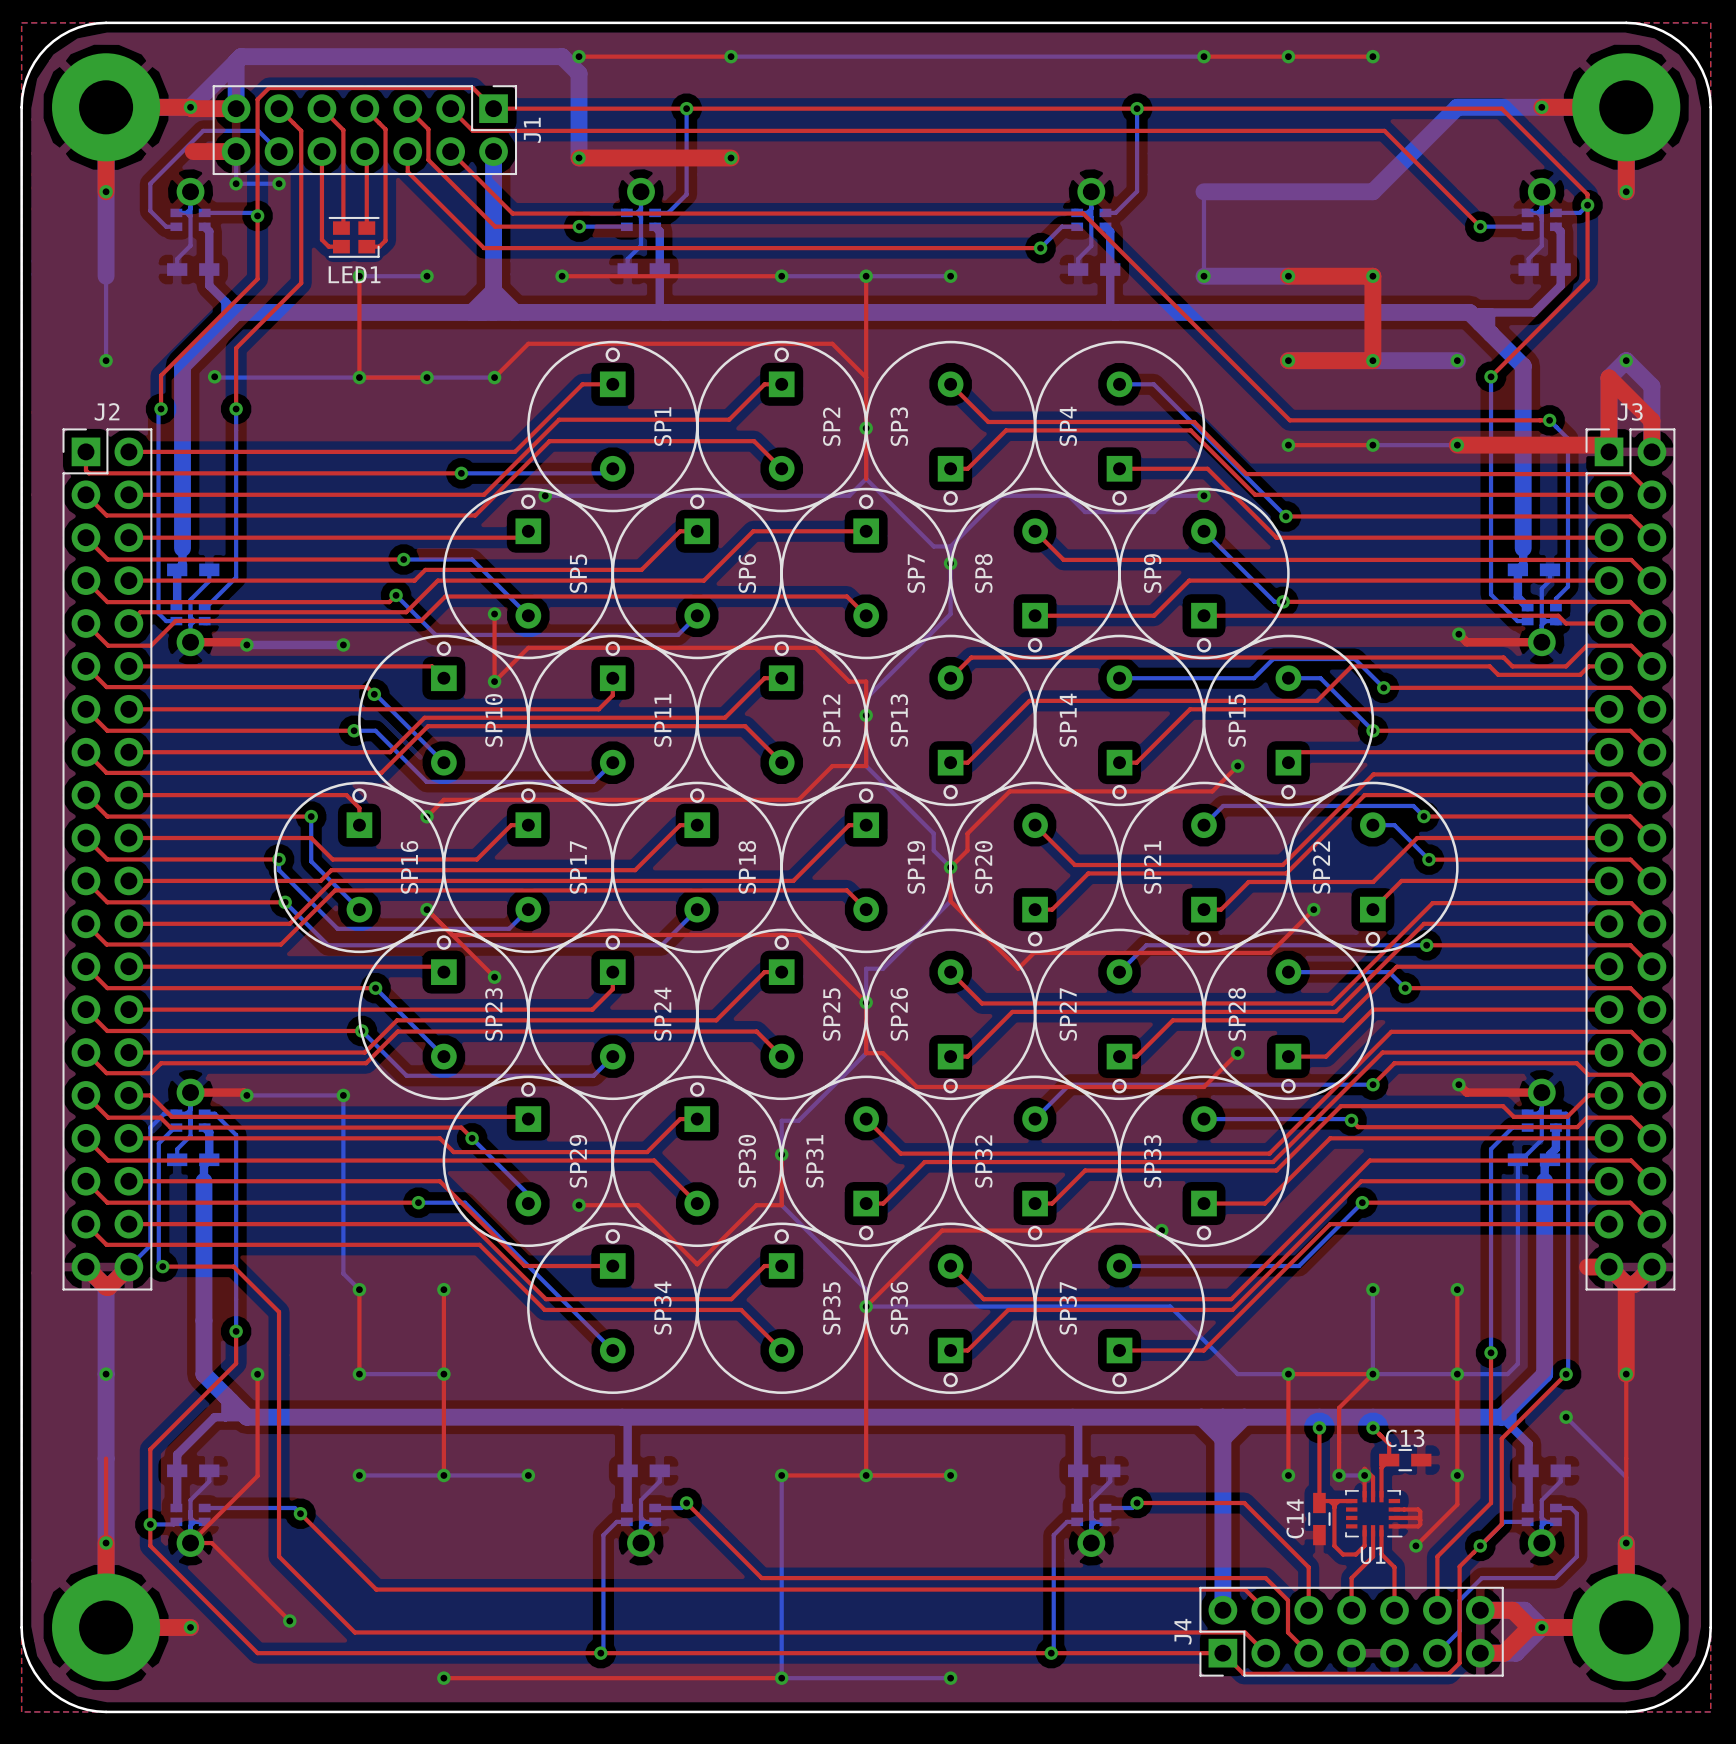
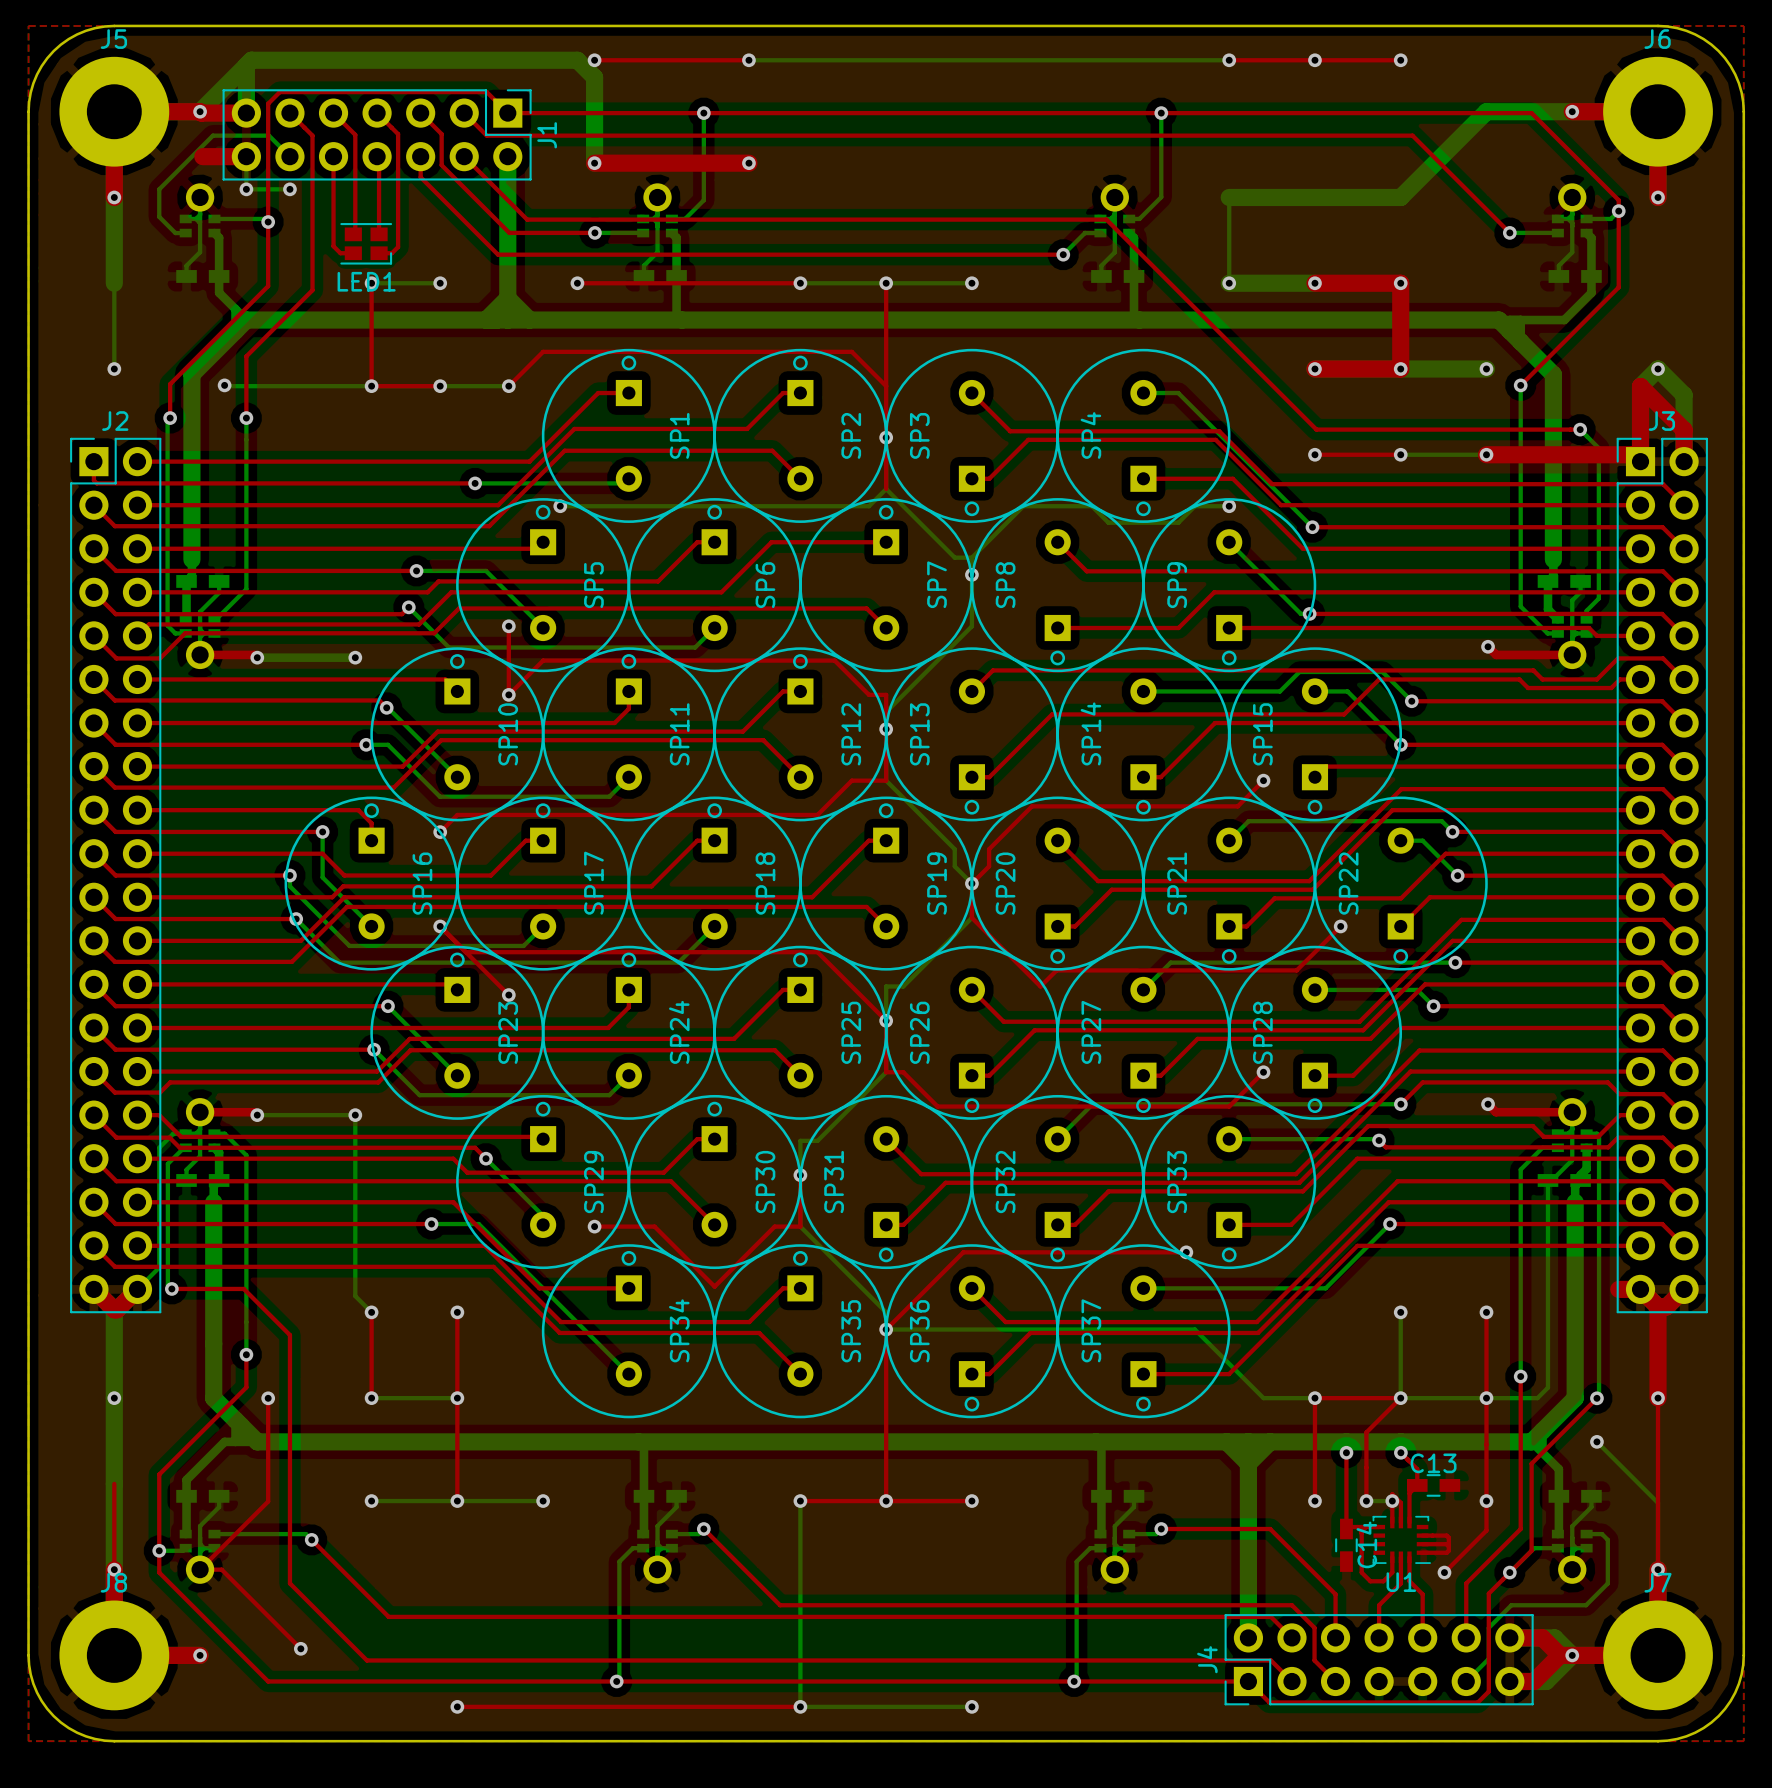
J5 name: none -> J5 (113, 39)
J6 name: none -> J6 (1657, 39)
C14 name position: C14 (1295, 1518) -> C14 (1366, 1544)
J8 name: none -> J8 (113, 1582)
J7 name: none -> J7 (1658, 1582)

